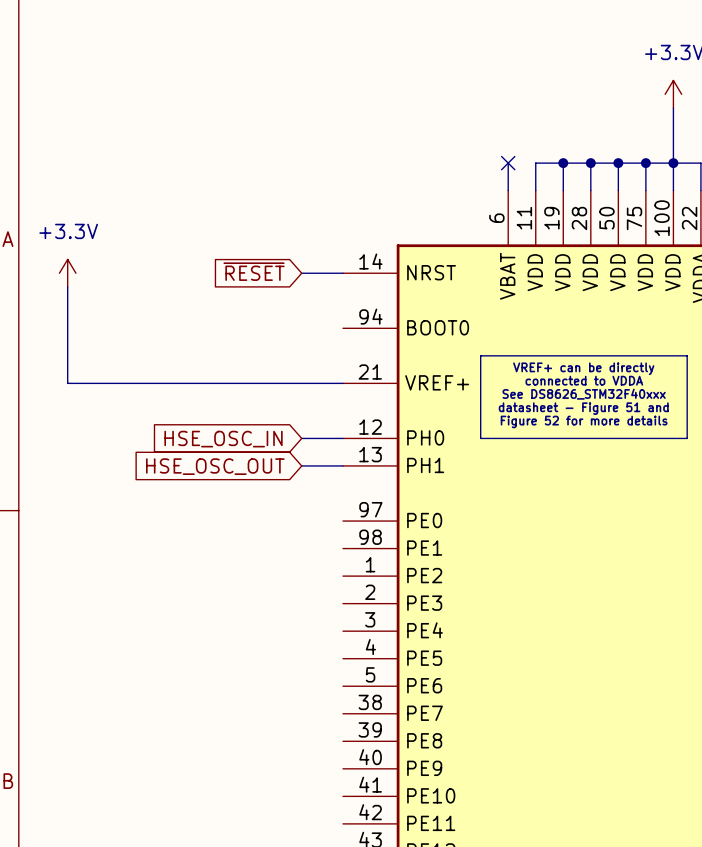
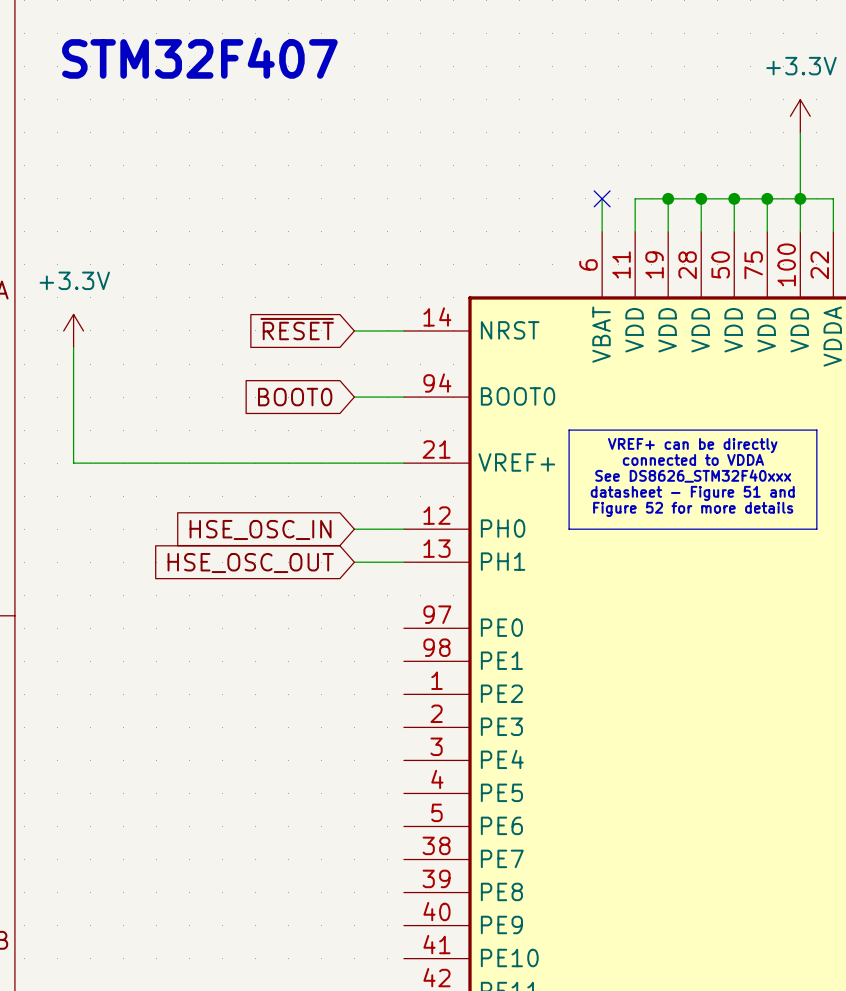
text: none -> STM32F407 (199, 58)
global label: none -> BOOT0 (295, 397)
wire: none -> (354, 397) (403, 397)

